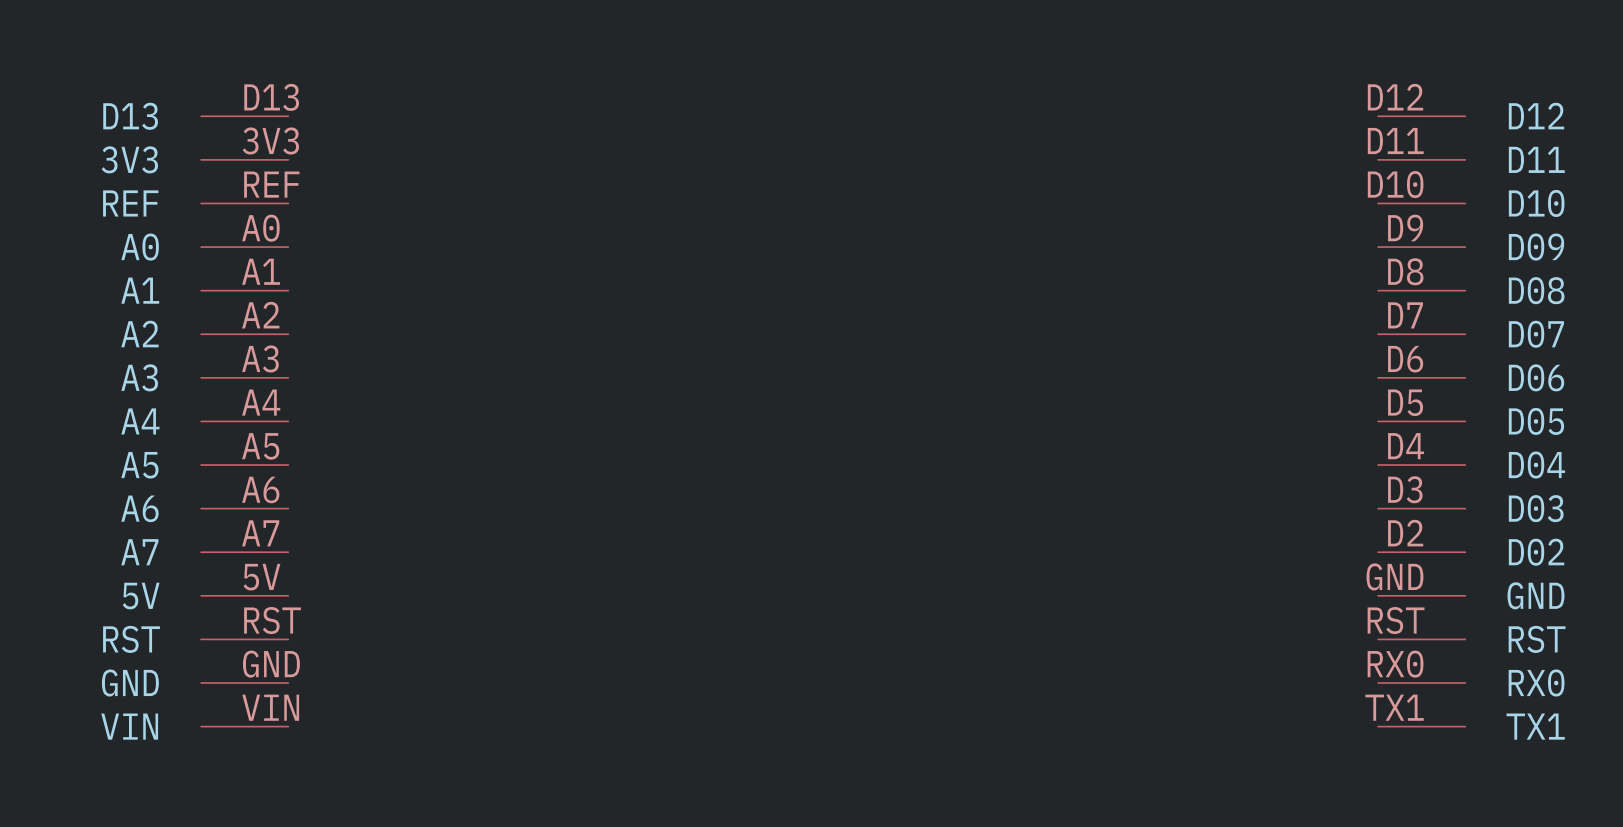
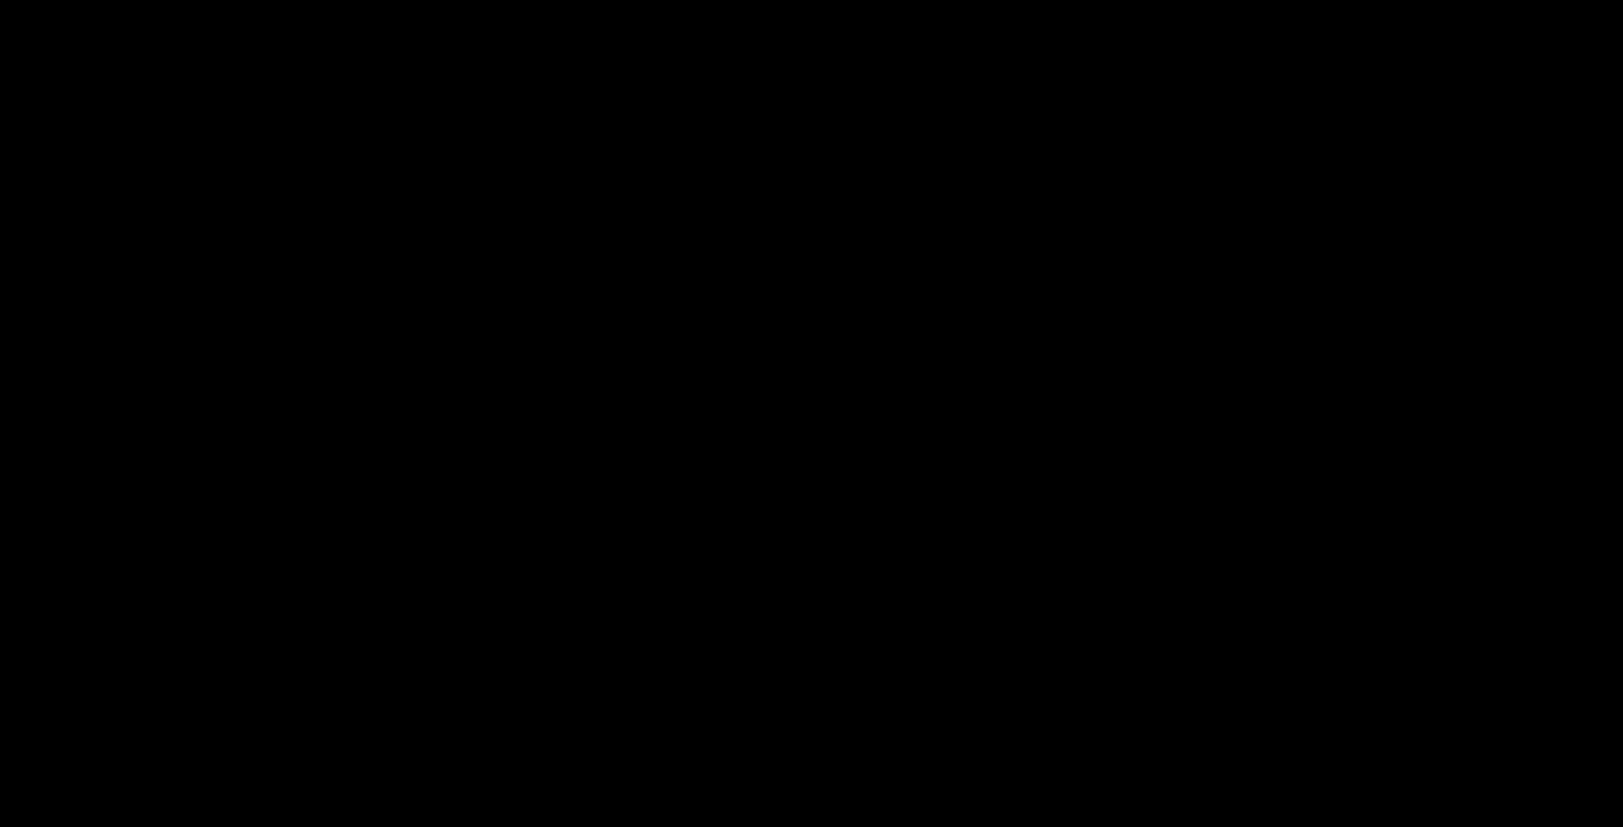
part: (244, 421) -> none
part: (1421, 421) -> none

